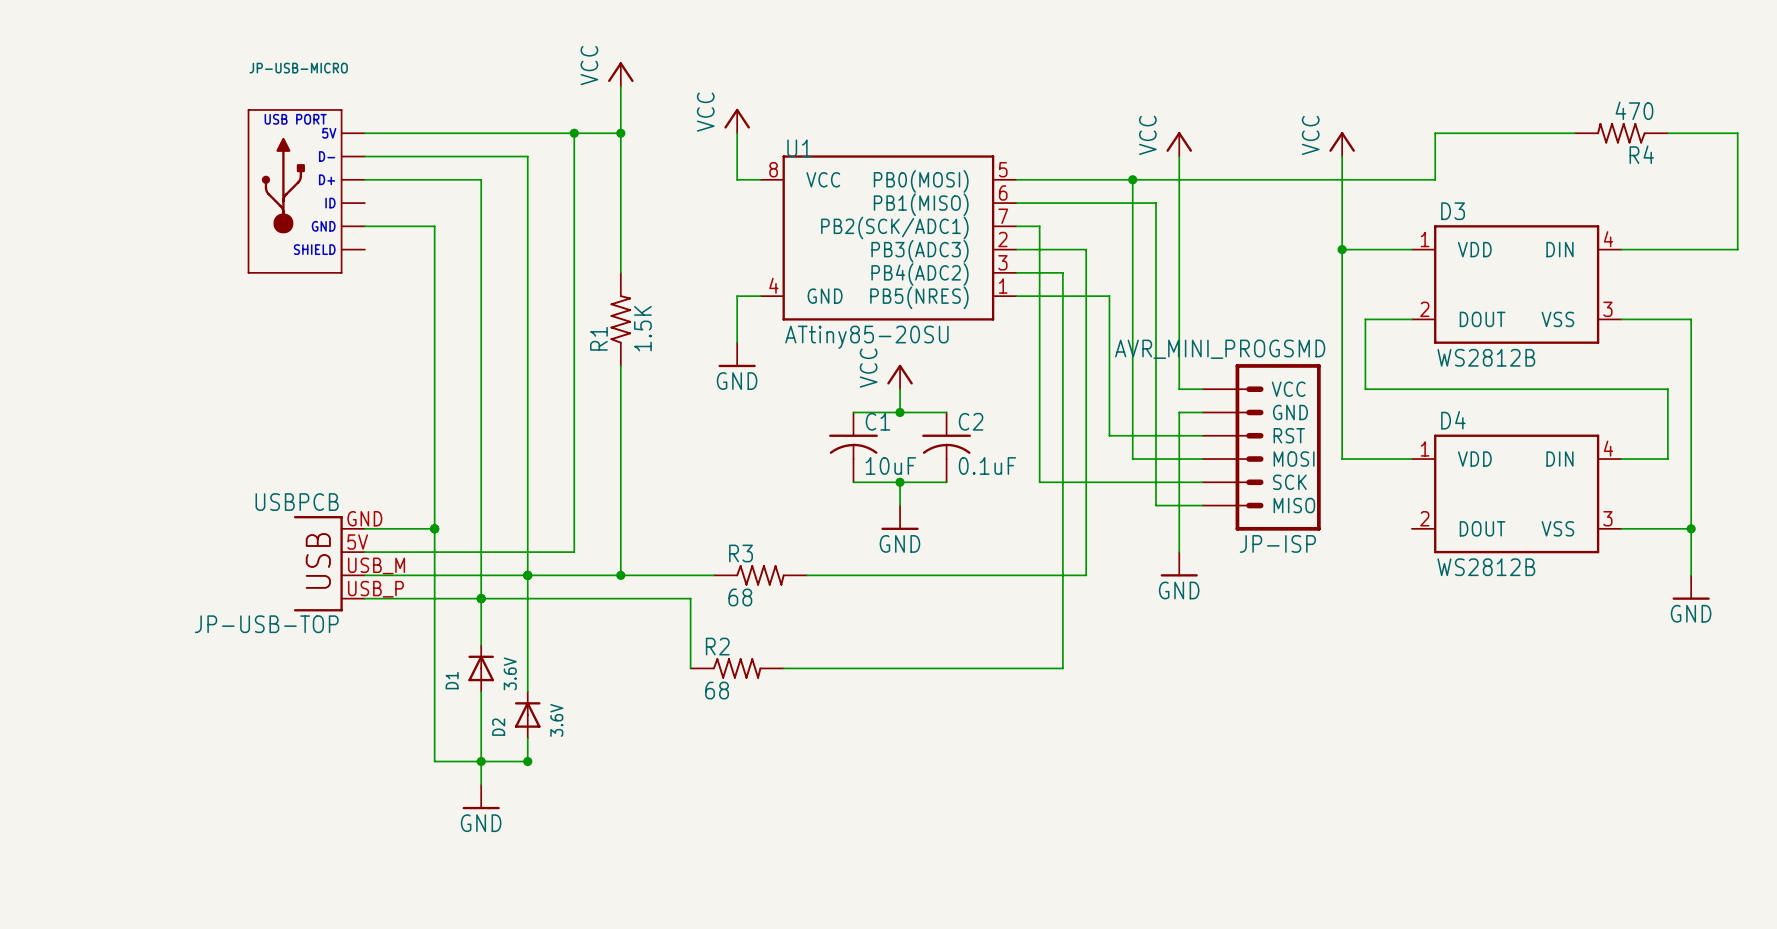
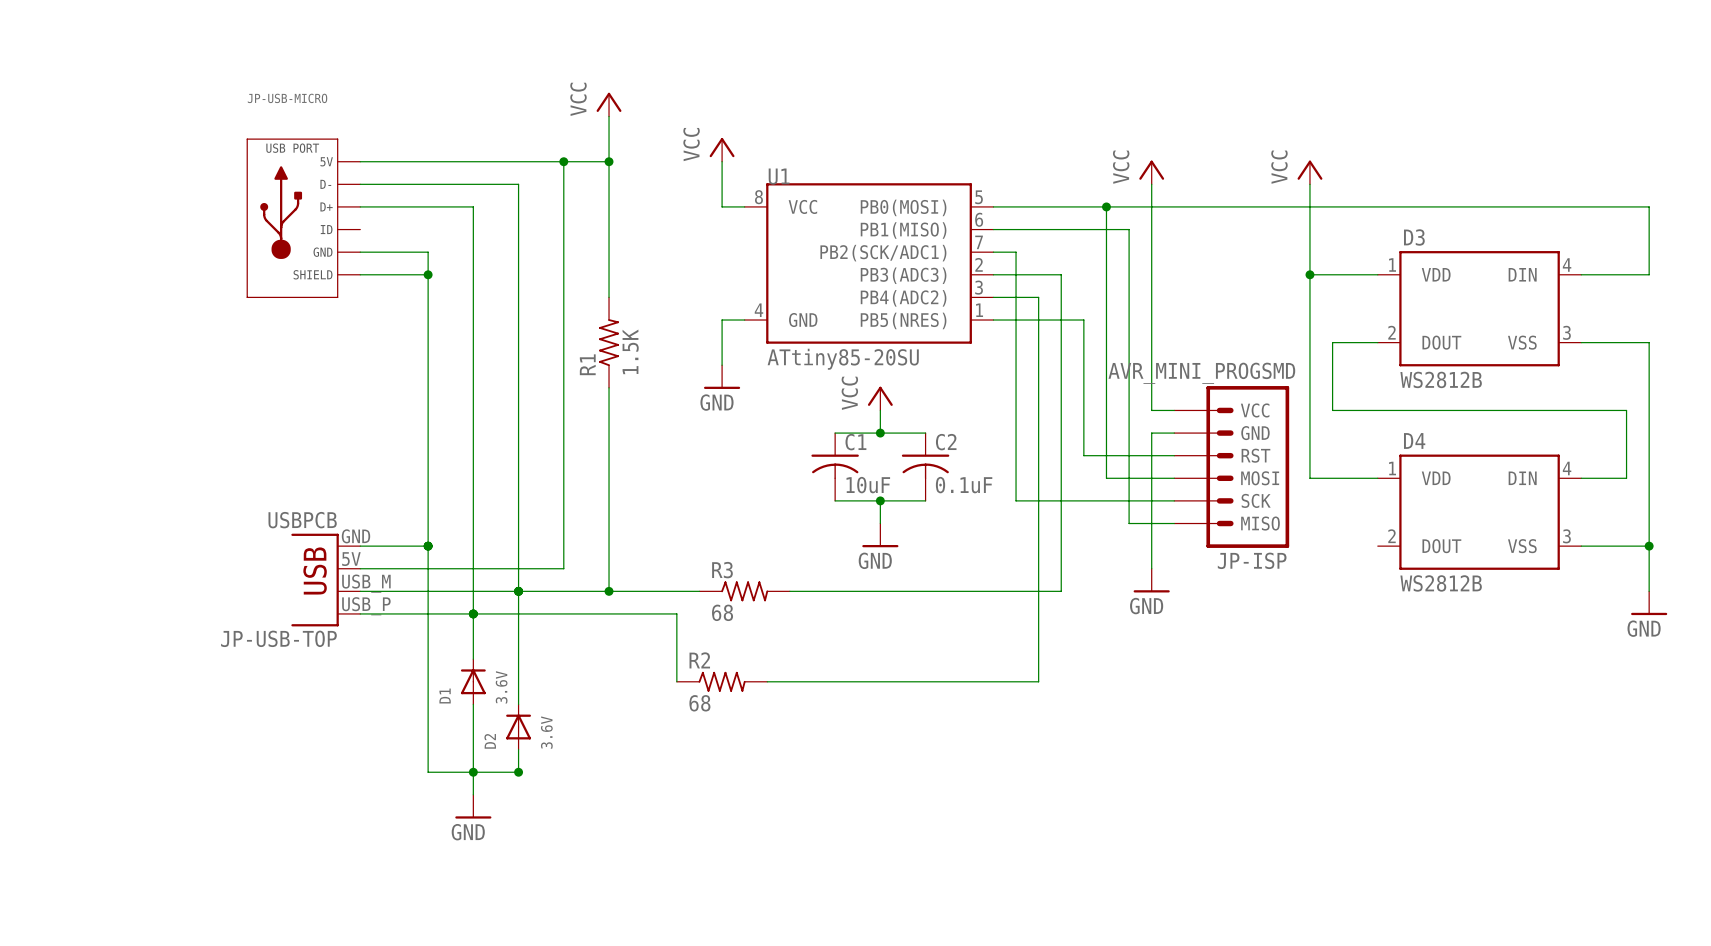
wire: (1574, 133) (1435, 133) (1435, 179) -> (1649, 274) (1649, 206) (1400, 206)
R4: 470 (1621, 133) -> none
wire: (1667, 133) (1737, 133) (1737, 249) (1691, 249) -> none
wire: none -> (360, 274) (428, 274)
junction: none -> (428, 274)

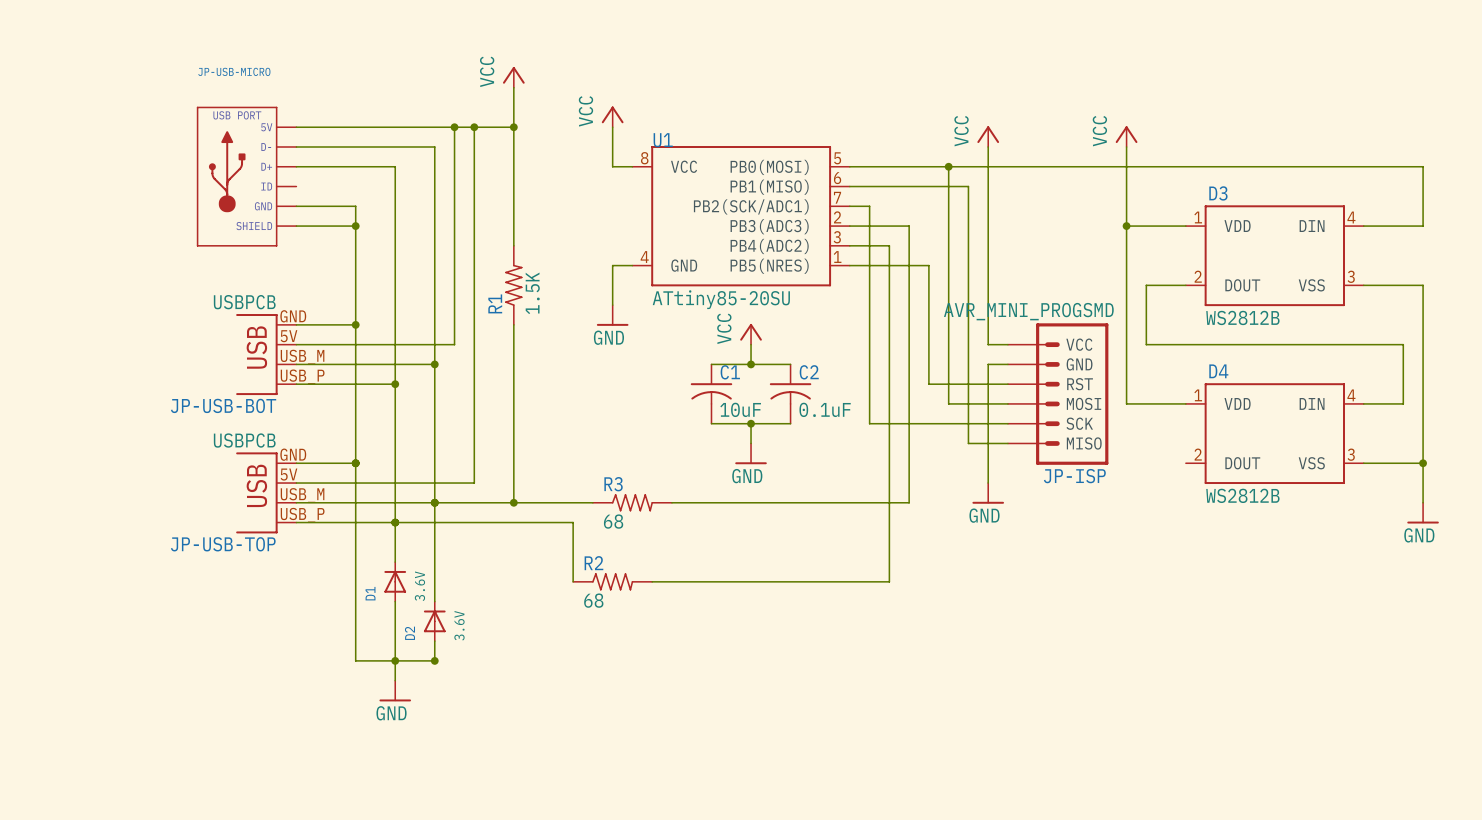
wire: none -> (454, 127) (454, 344) (296, 344)
junction: none -> (454, 127)
wire: none -> (296, 324) (355, 324)
junction: none -> (355, 324)
JP-USB-BOT: none -> USBPCB (266, 354)
wire: none -> (296, 364) (434, 364)
junction: none -> (434, 364)
wire: none -> (296, 384) (395, 384)
junction: none -> (395, 384)

